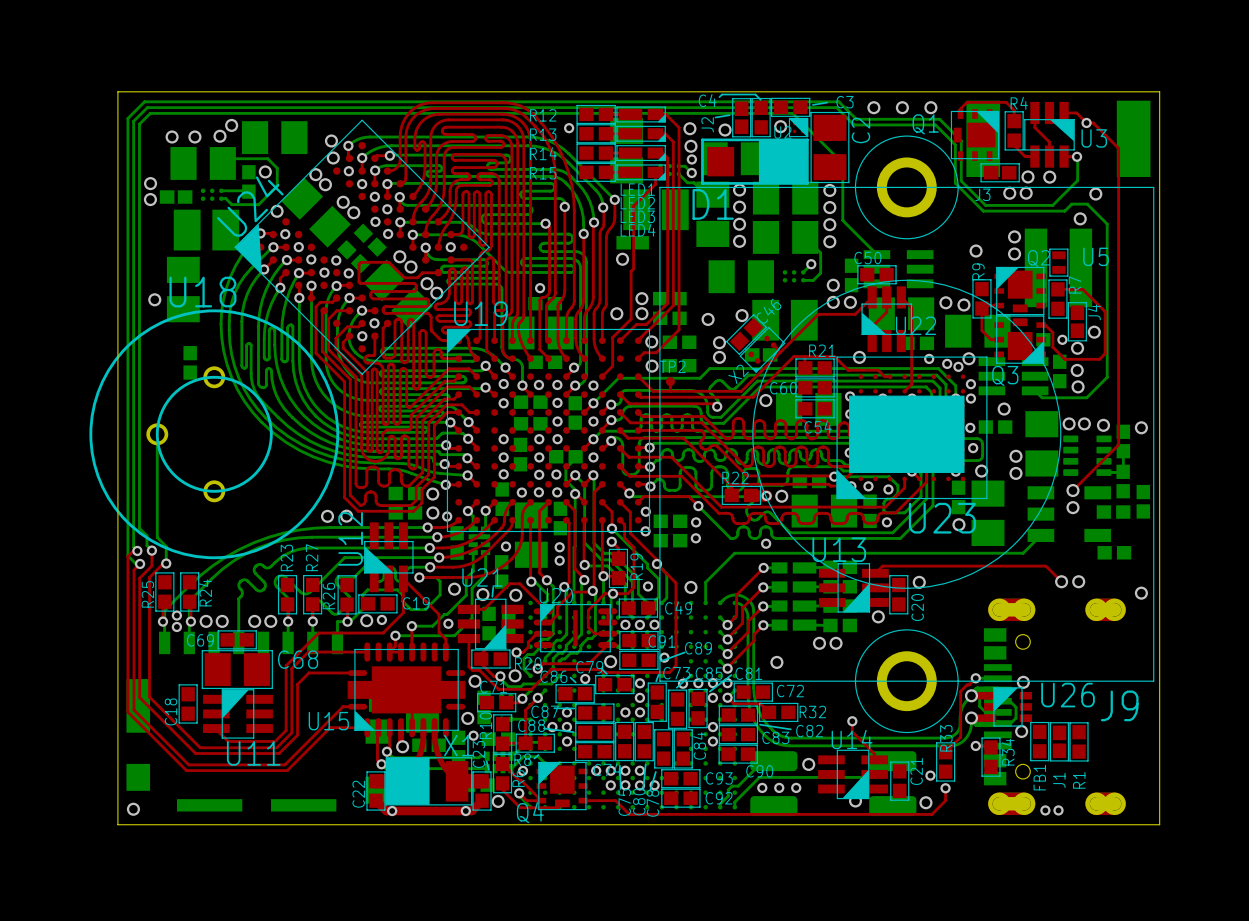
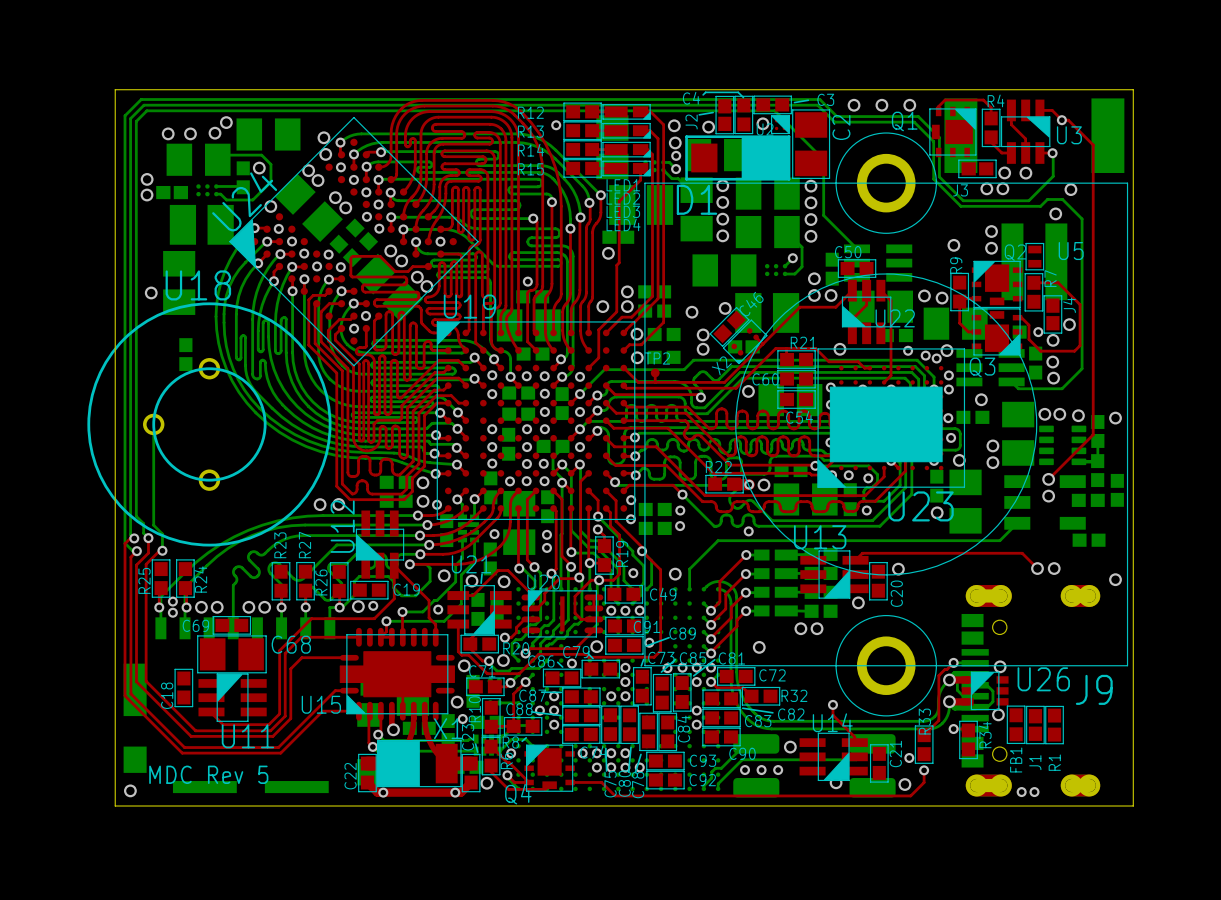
text: none -> MDC Rev 5 (208, 774)

